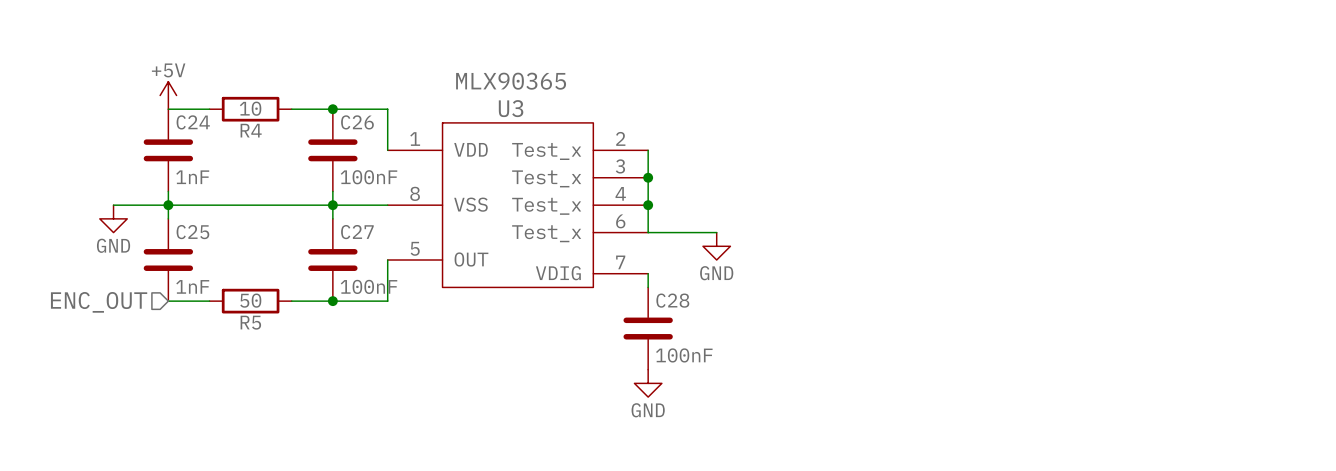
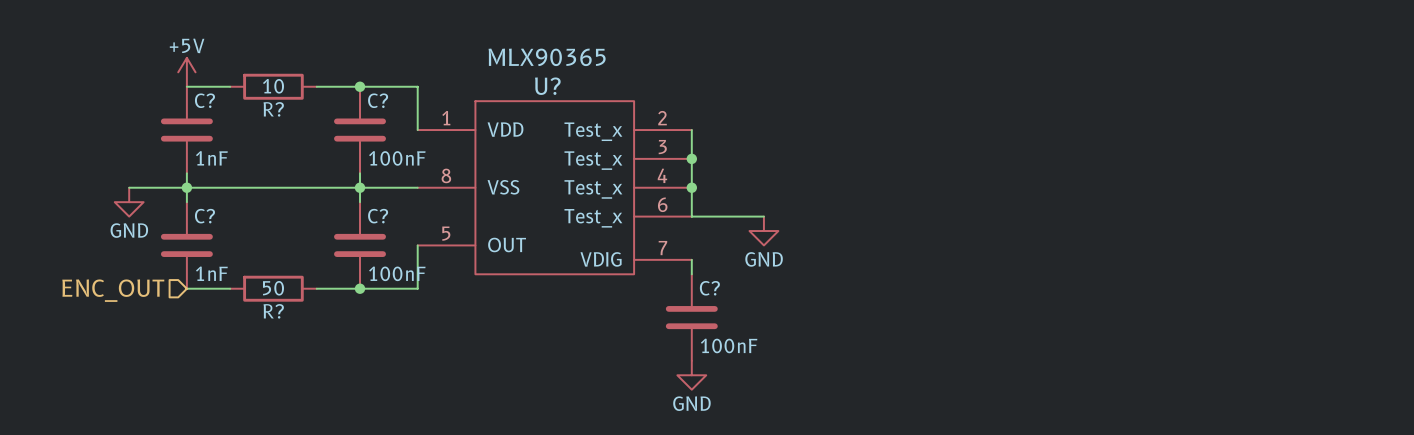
U3 name: U3 (511, 108) -> U? (547, 86)
C24 name: C24 (193, 122) -> C? (204, 100)
C26 name: C26 (357, 122) -> C? (378, 100)
R4 name: R4 (251, 130) -> R? (273, 109)
C25 name: C25 (192, 232) -> C? (204, 216)
C27 name: C27 (357, 232) -> C? (378, 216)
C28 name: C28 (672, 300) -> C? (709, 288)
R5 name: R5 (250, 322) -> R? (273, 311)

